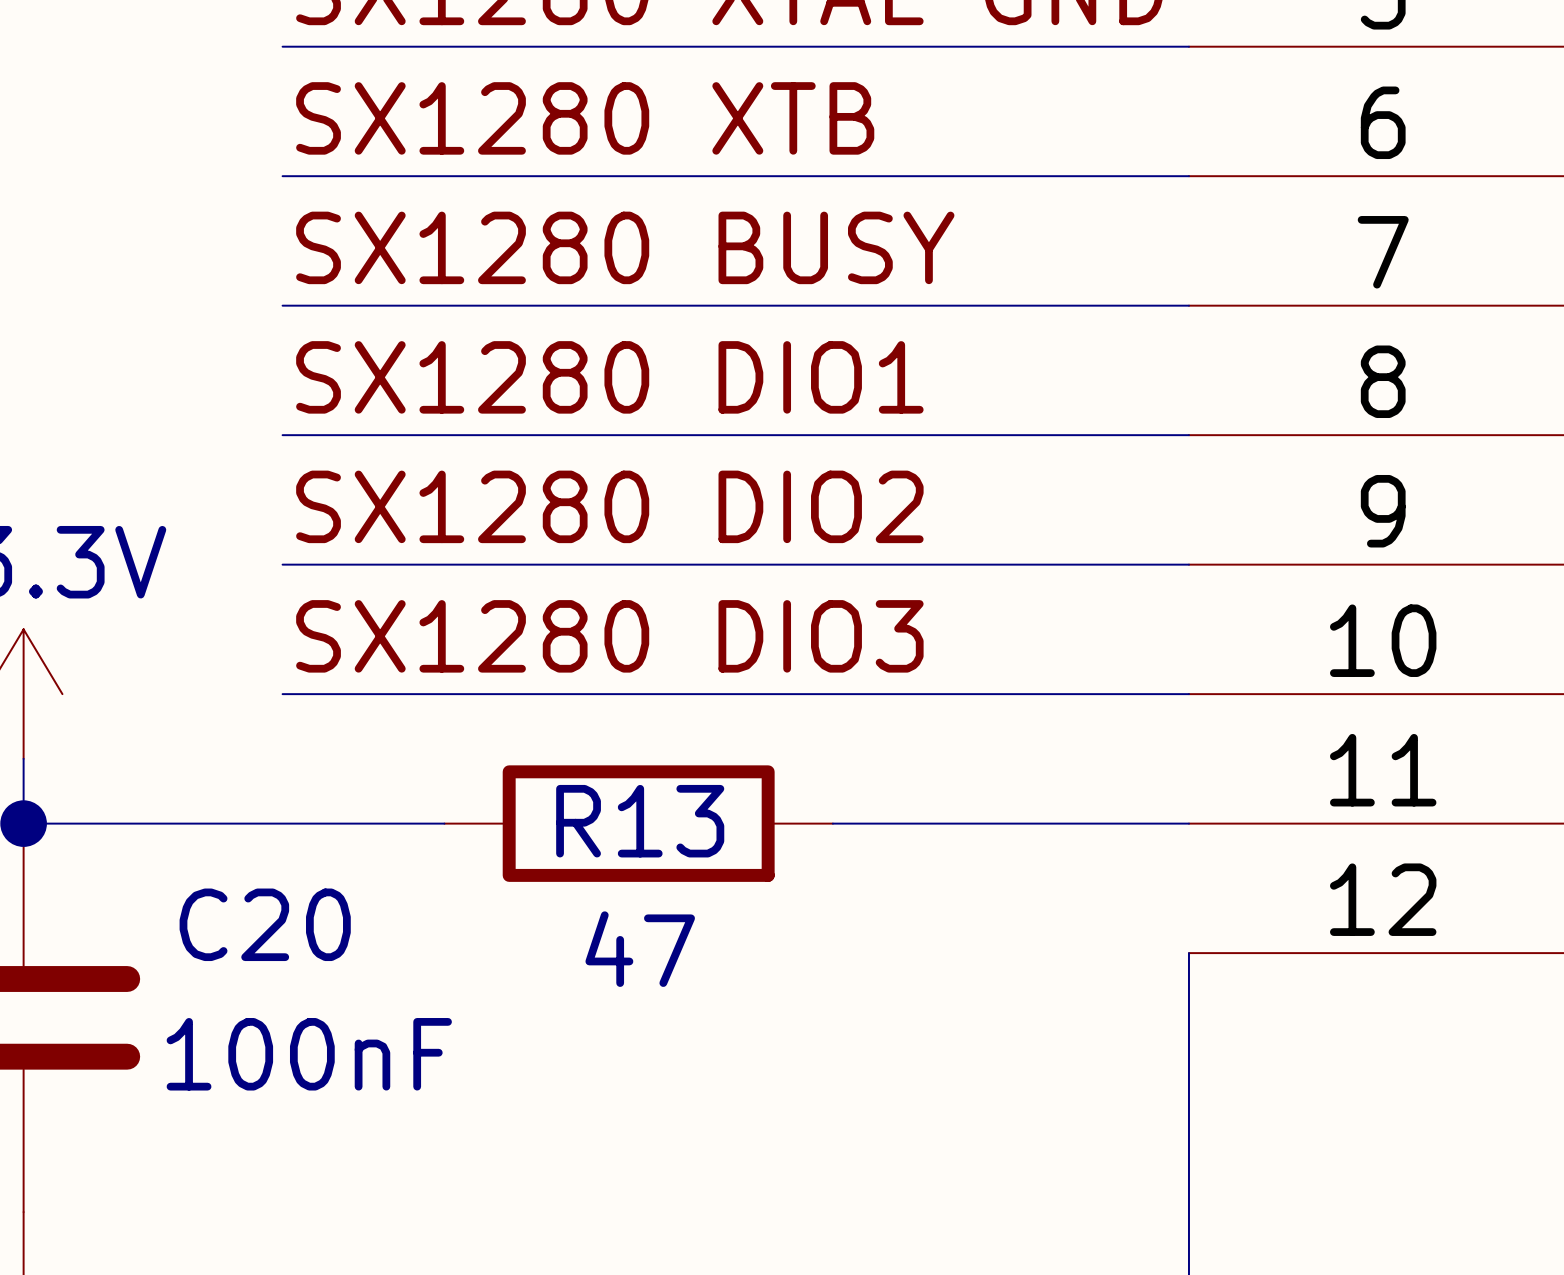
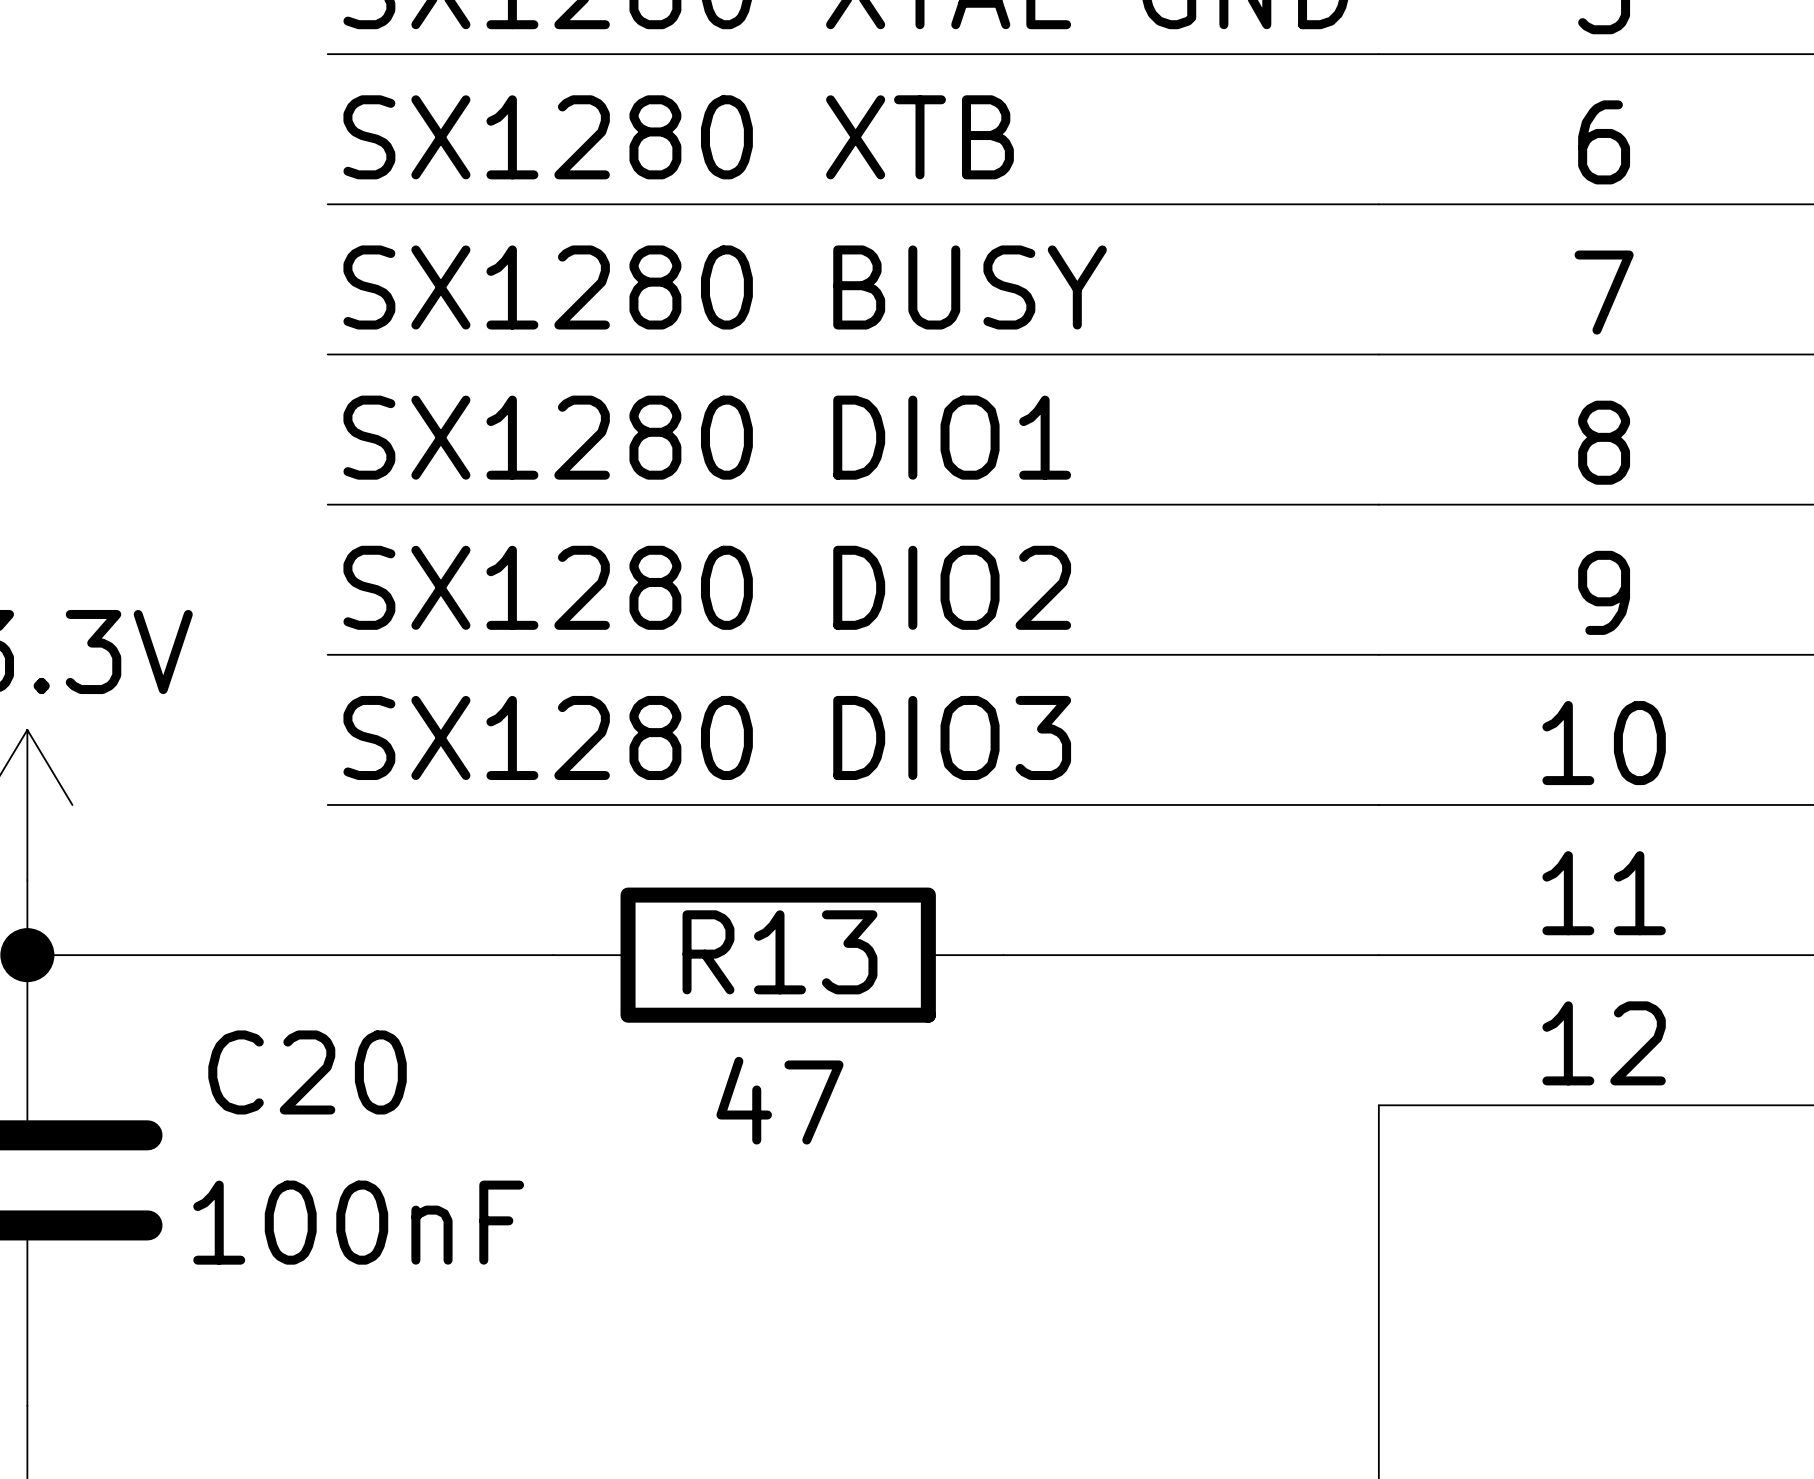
R13 position: (638, 823) -> (778, 955)

